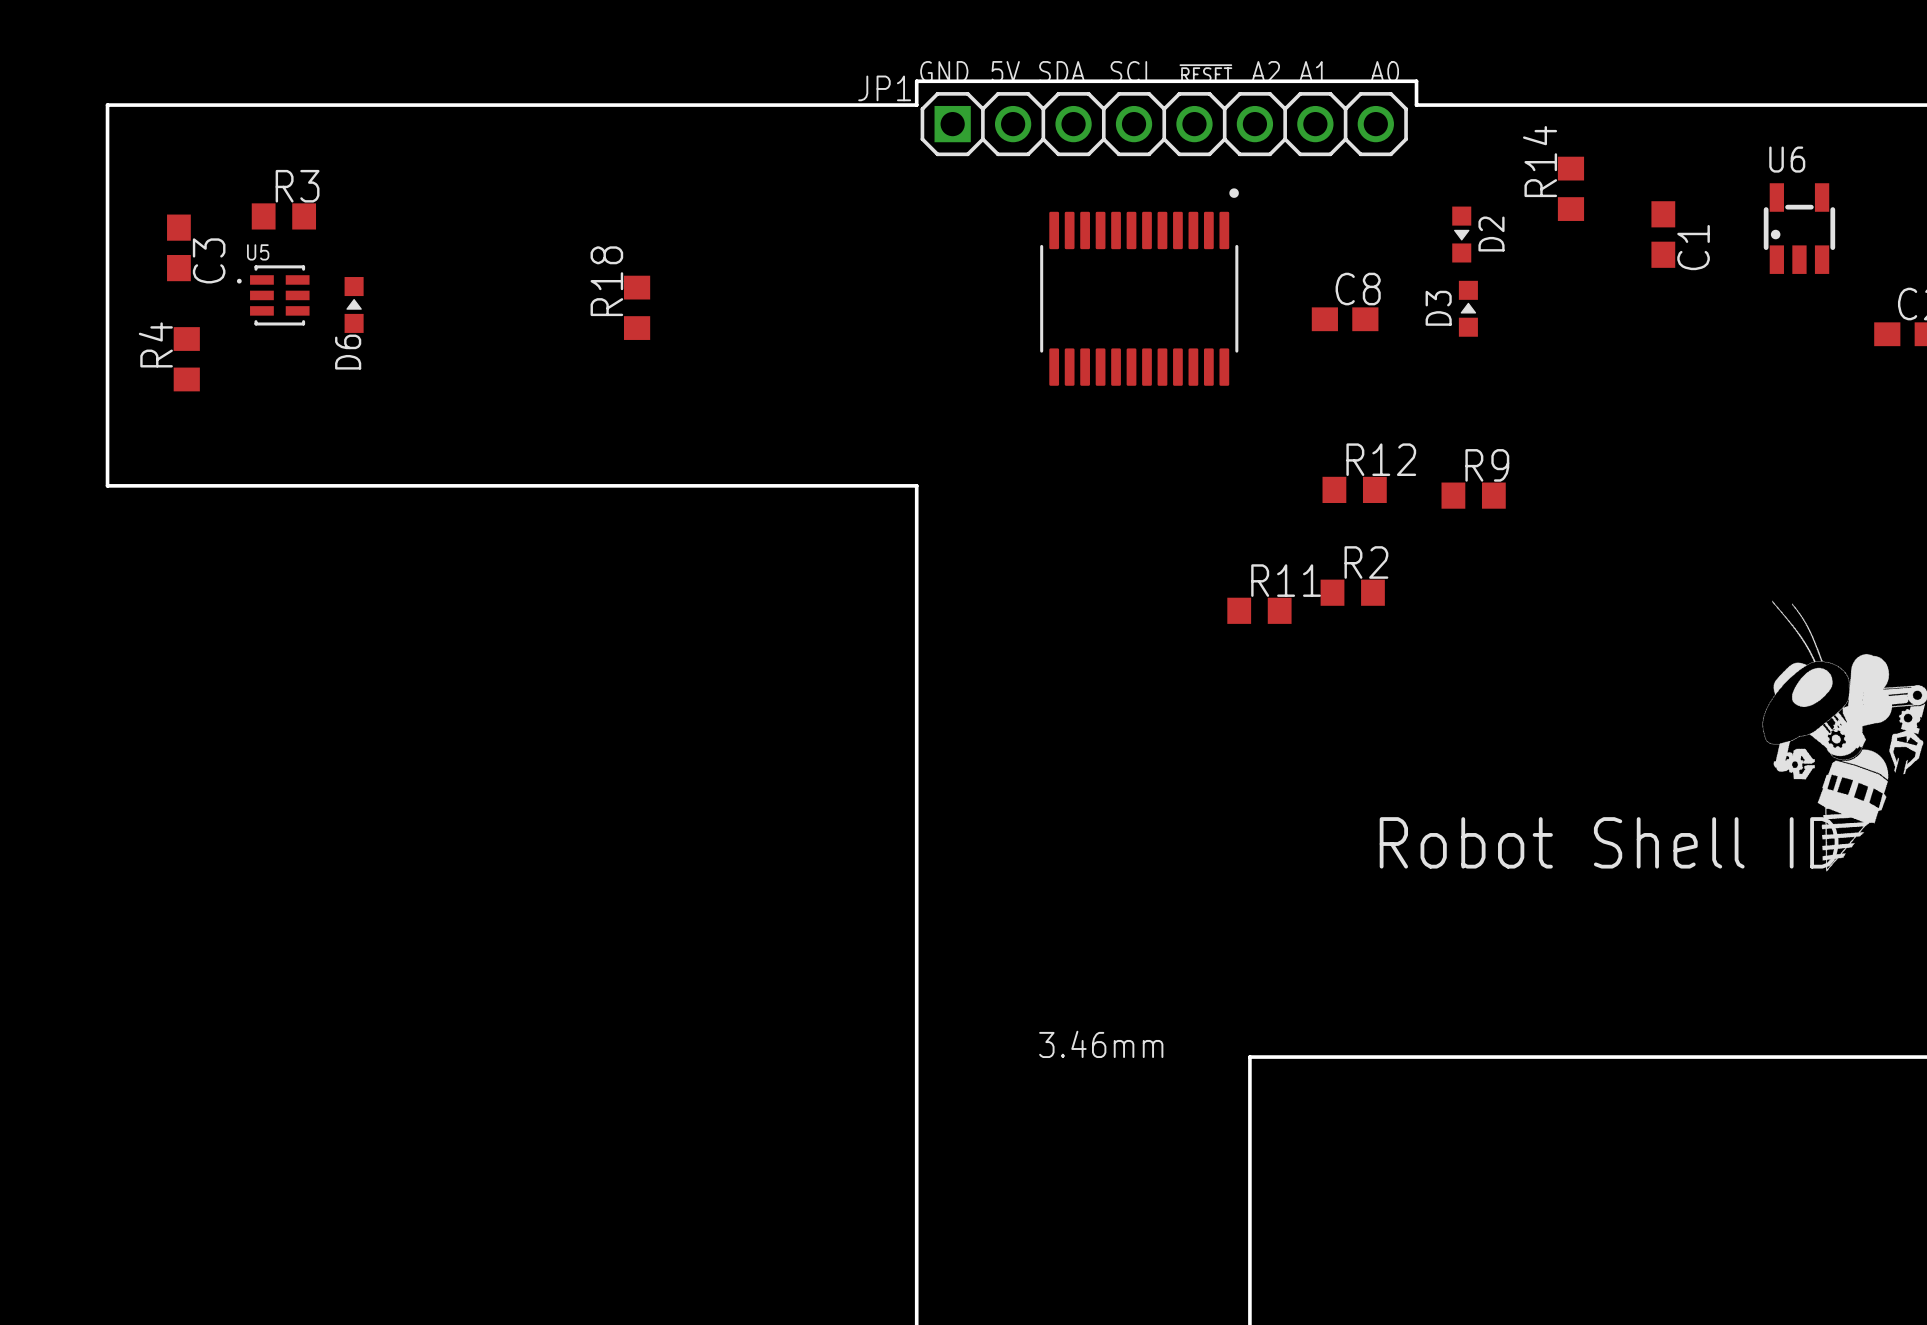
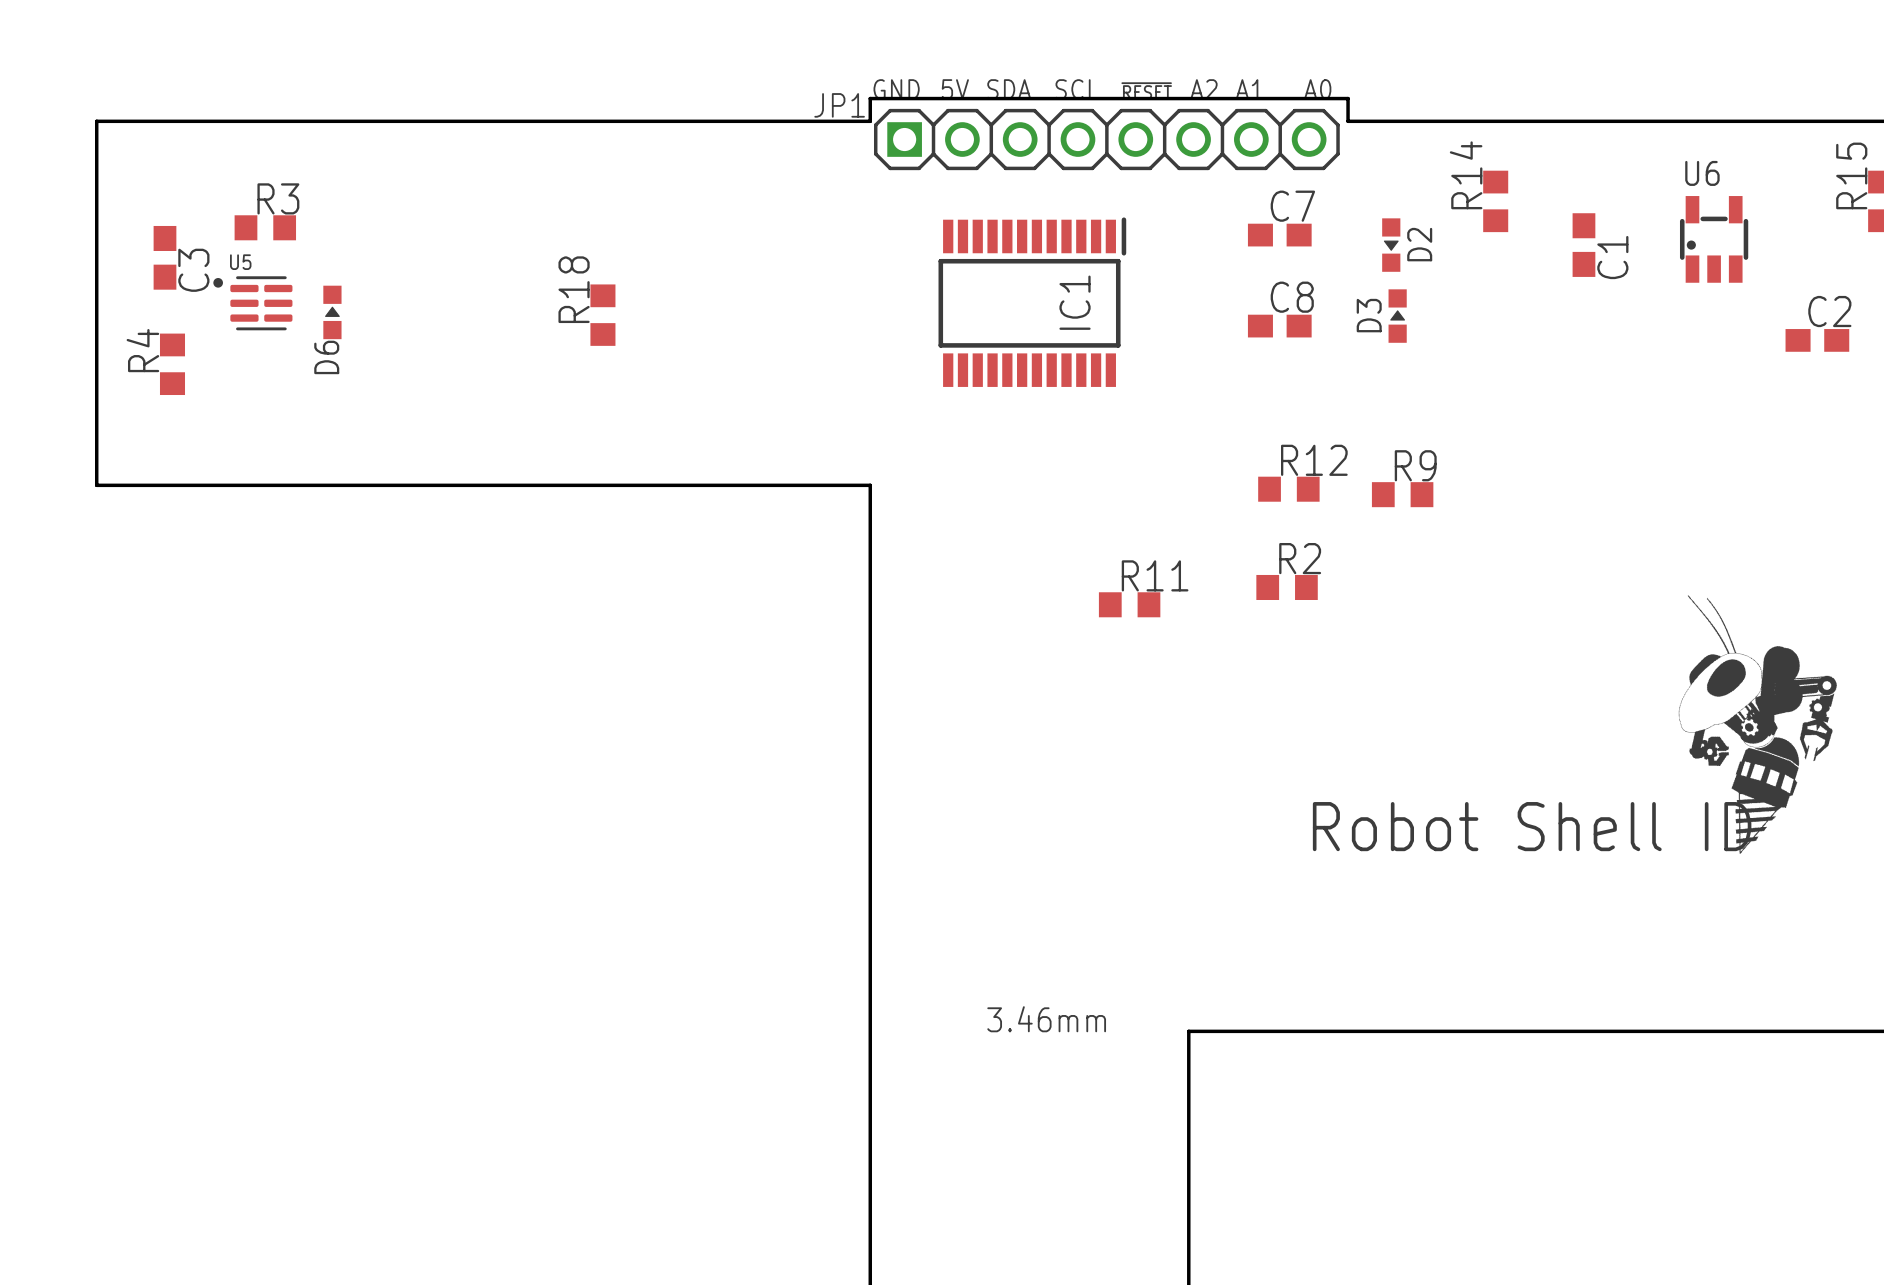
C7: none -> (1279, 235)
U5 footprint: [236, 265, 310, 326] -> [213, 276, 293, 331]
part: (1139, 287) -> none
IC1: none -> (1032, 302)
R11 position: (1259, 610) -> (1129, 604)

